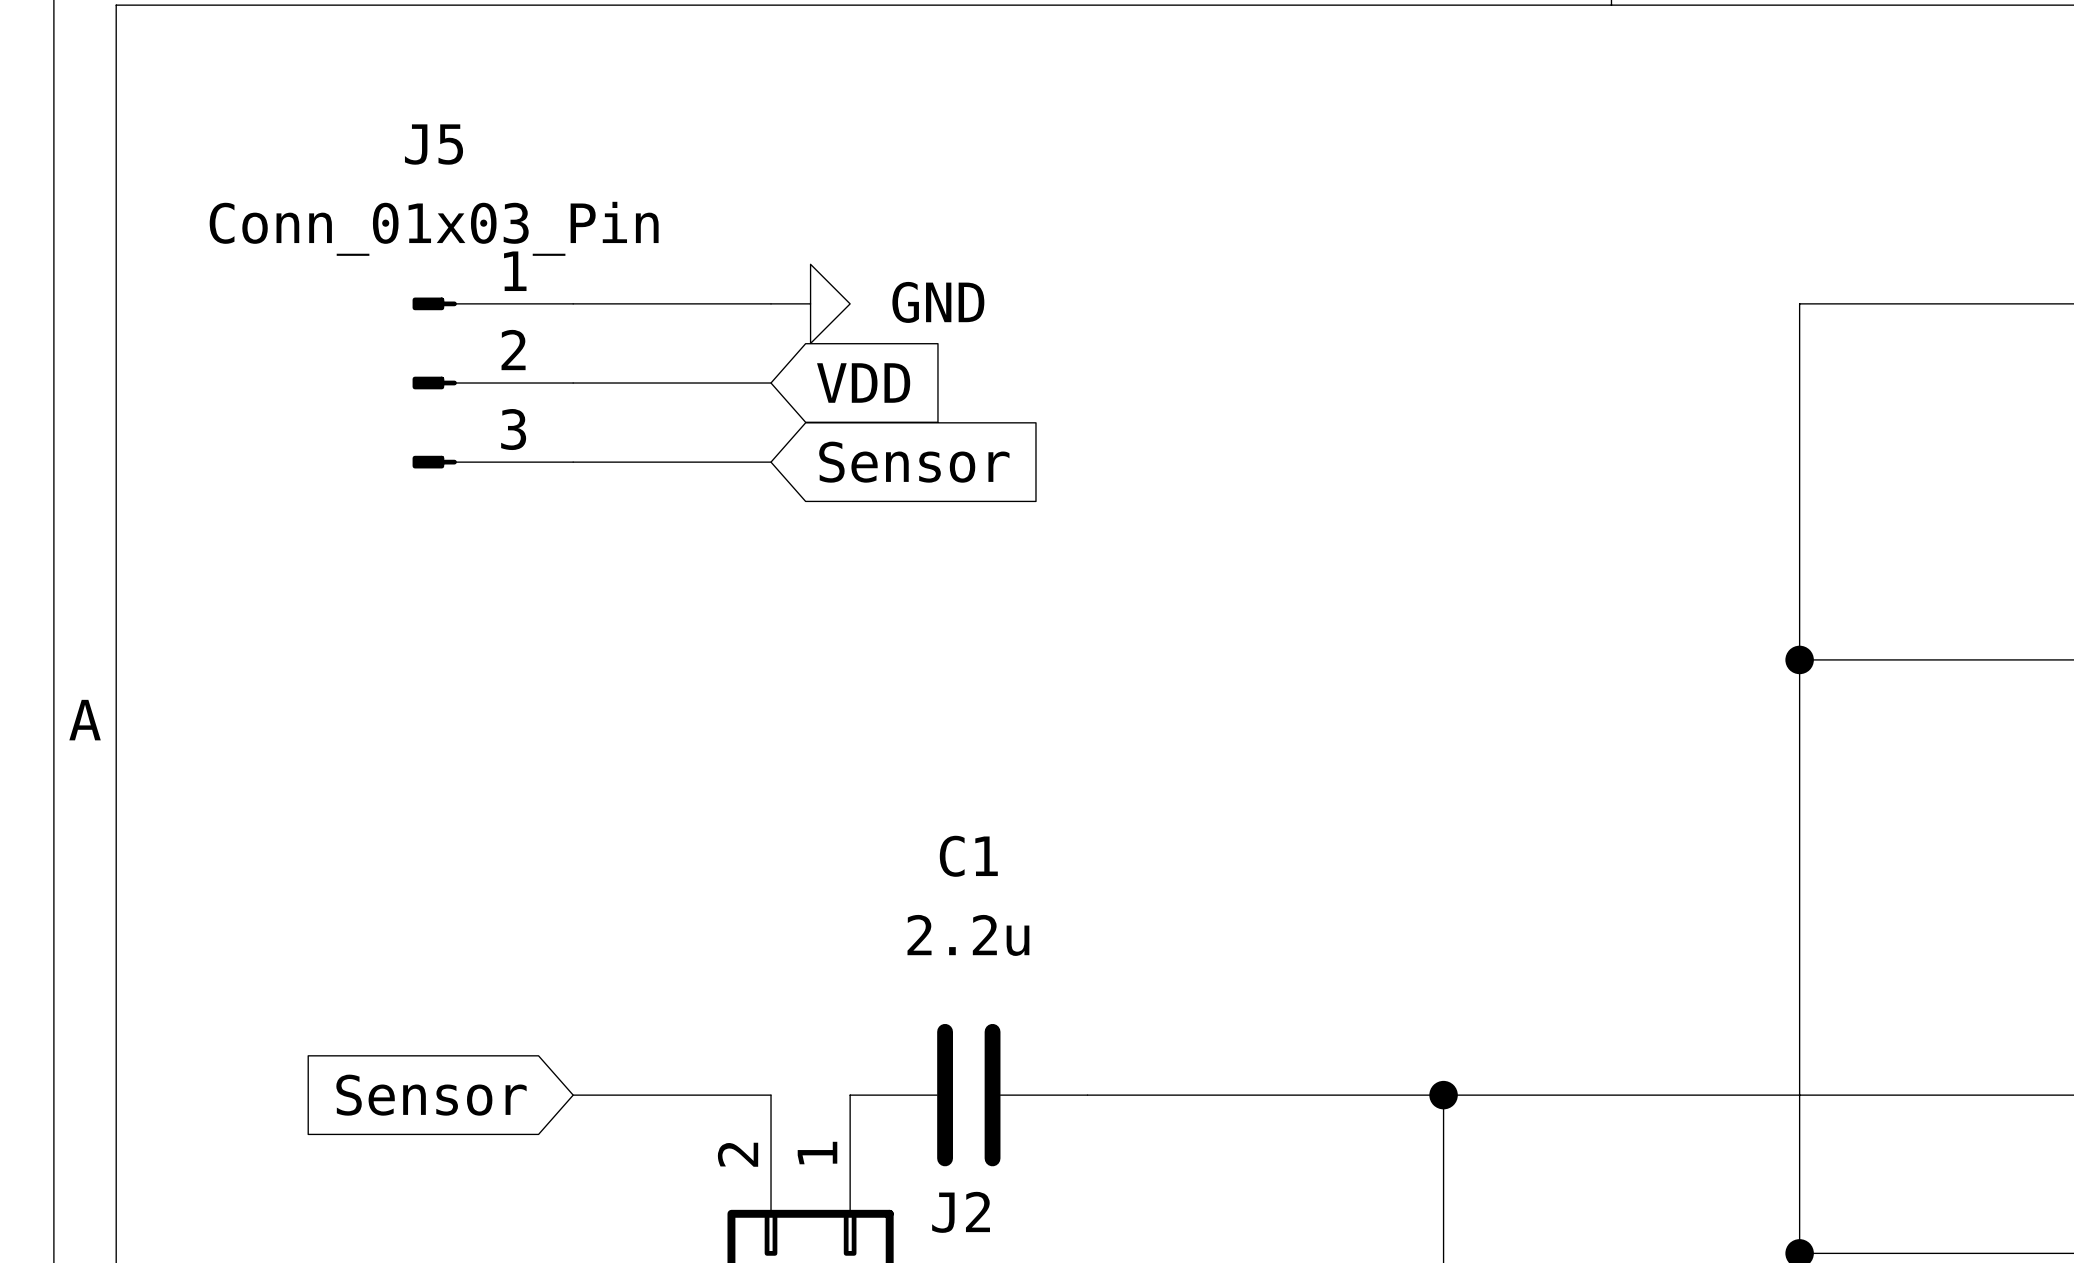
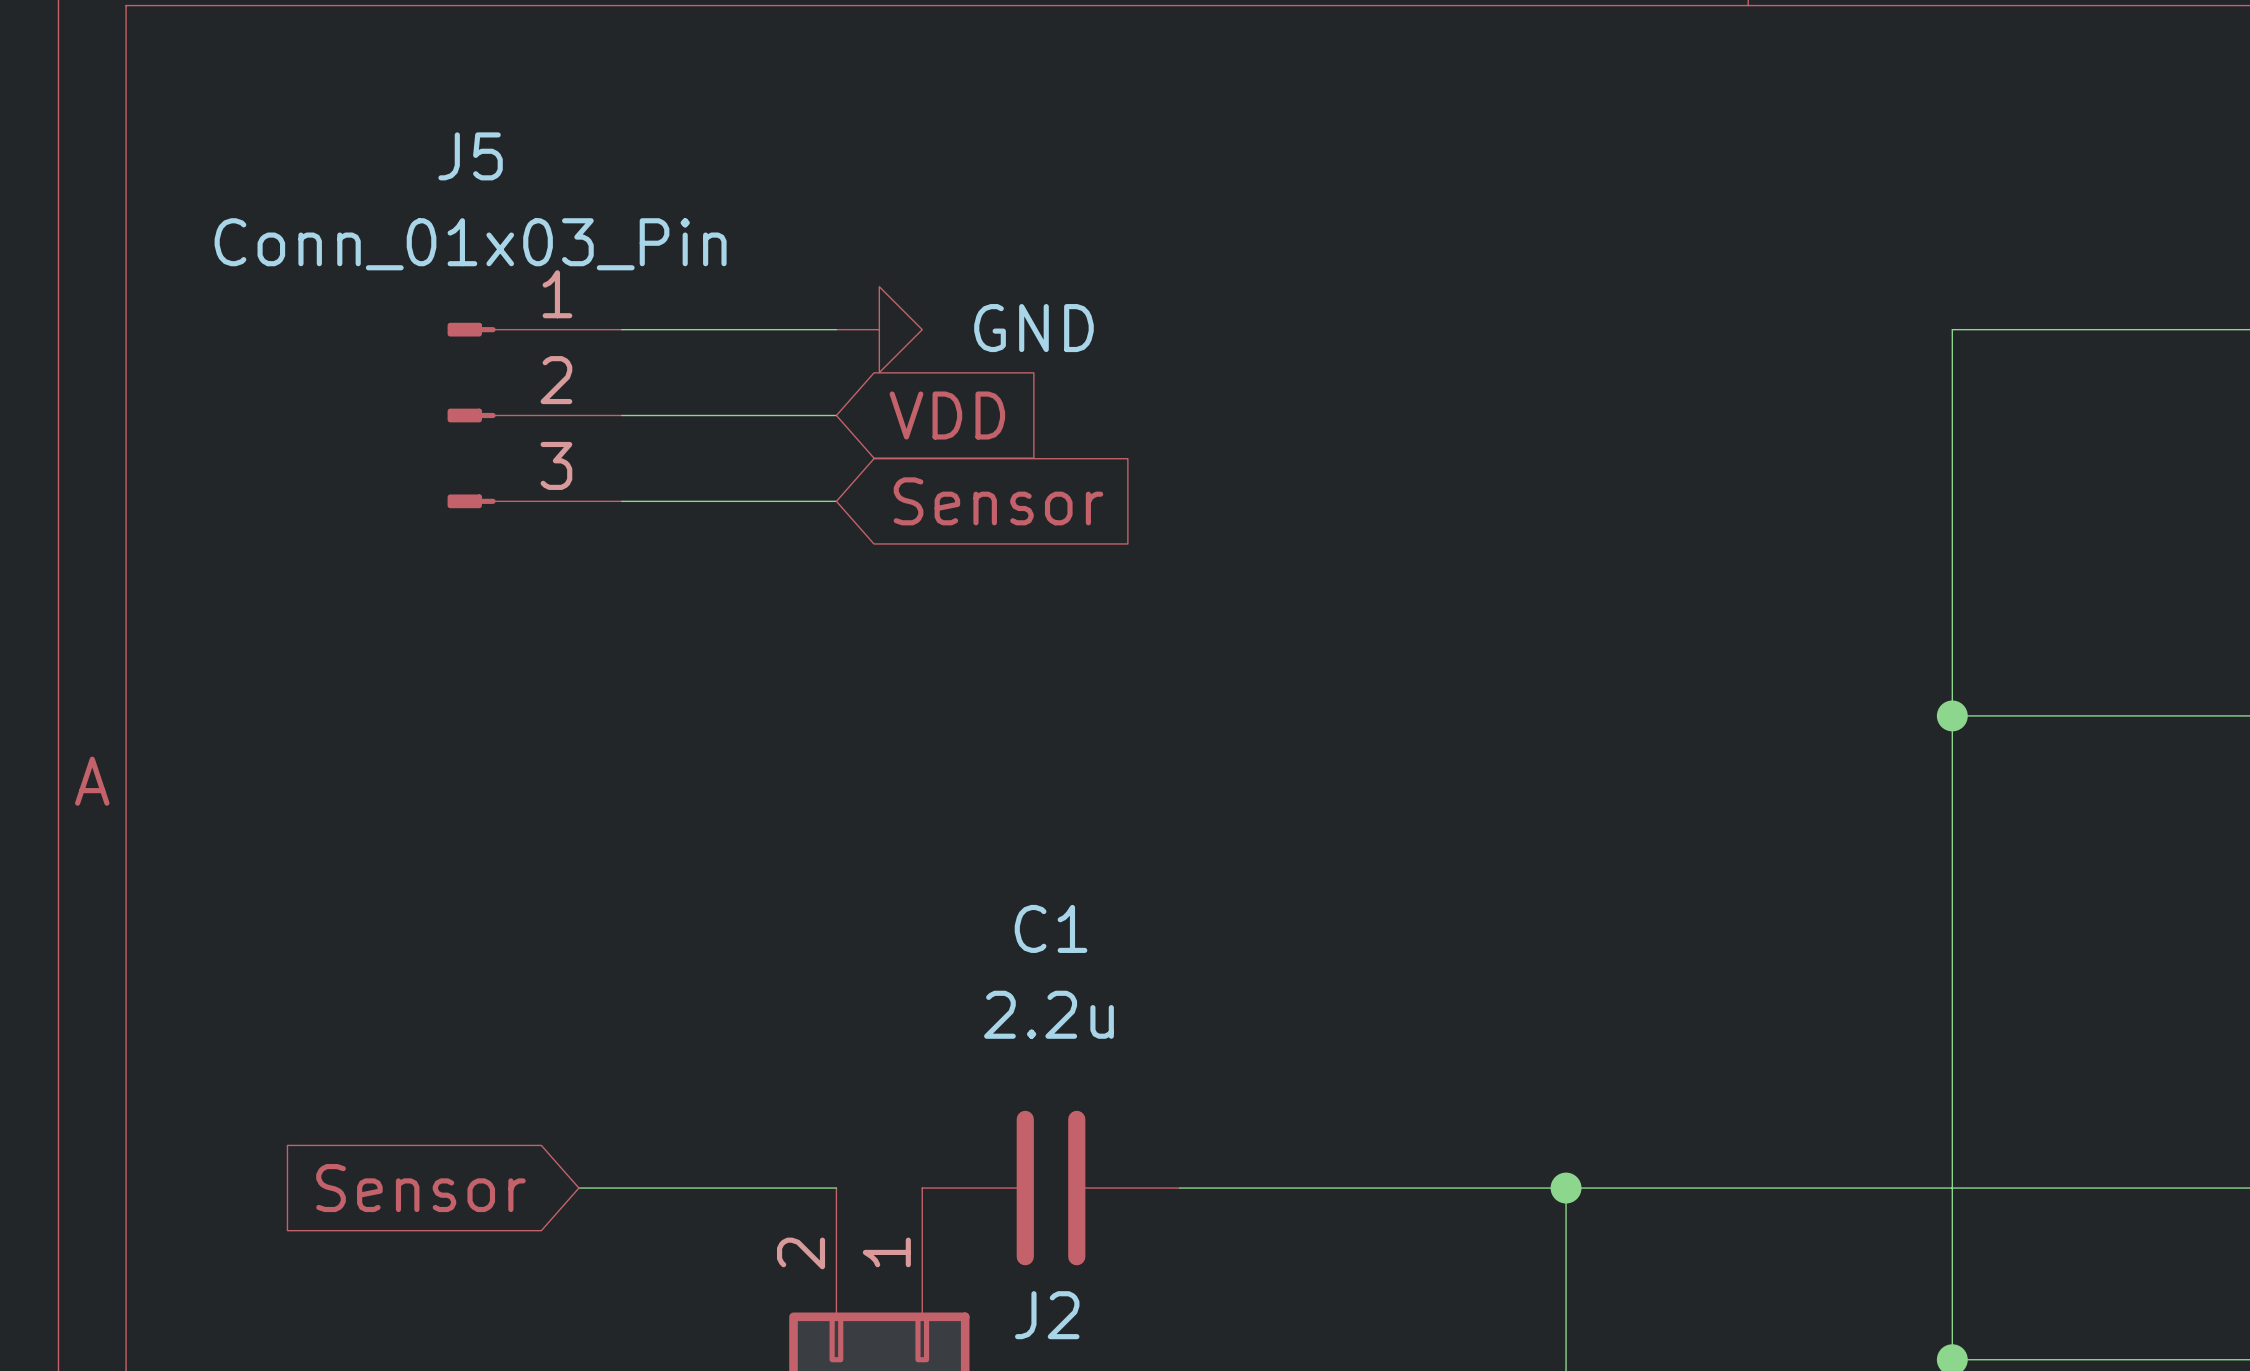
global label position: Sensor (431, 1095) -> Sensor (420, 1188)
wire: none -> (578, 1188) (621, 1188)

